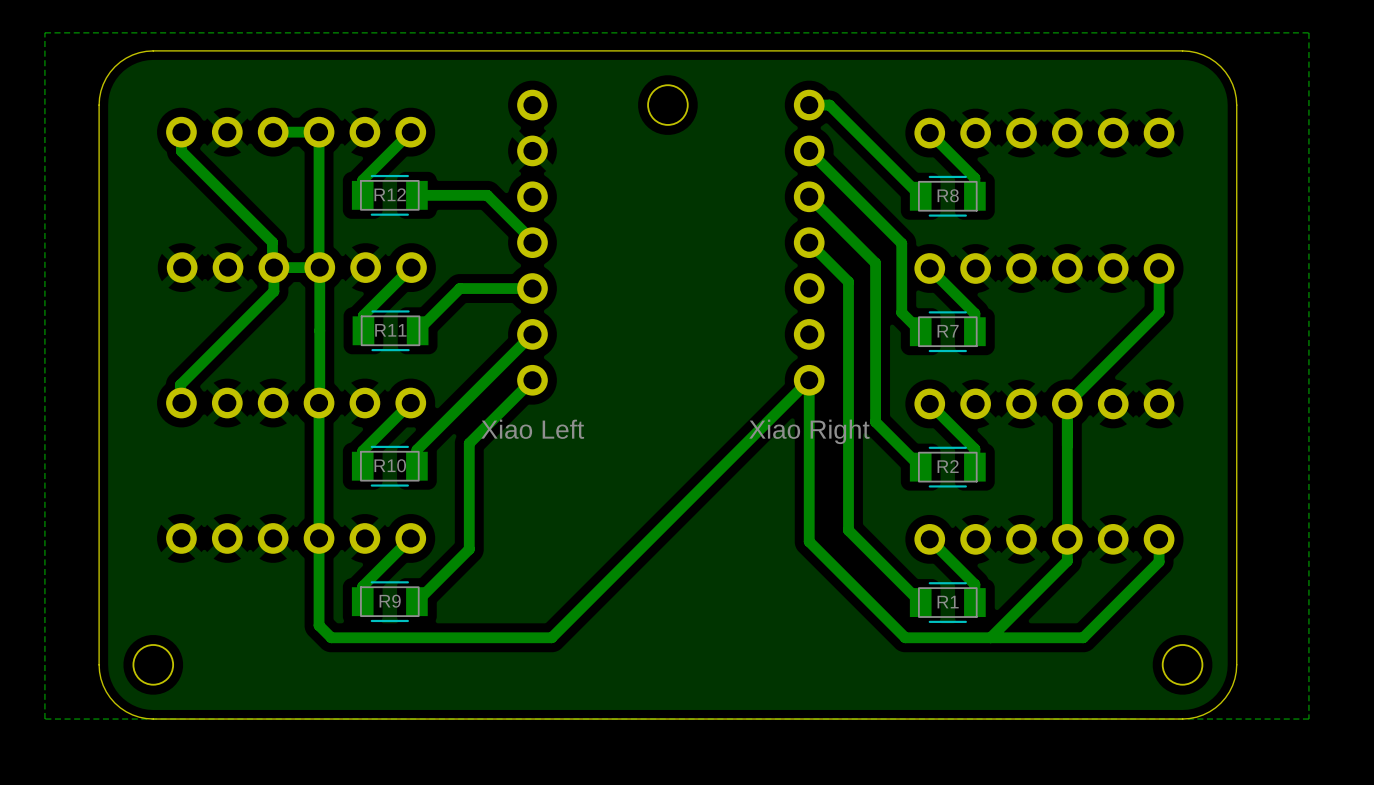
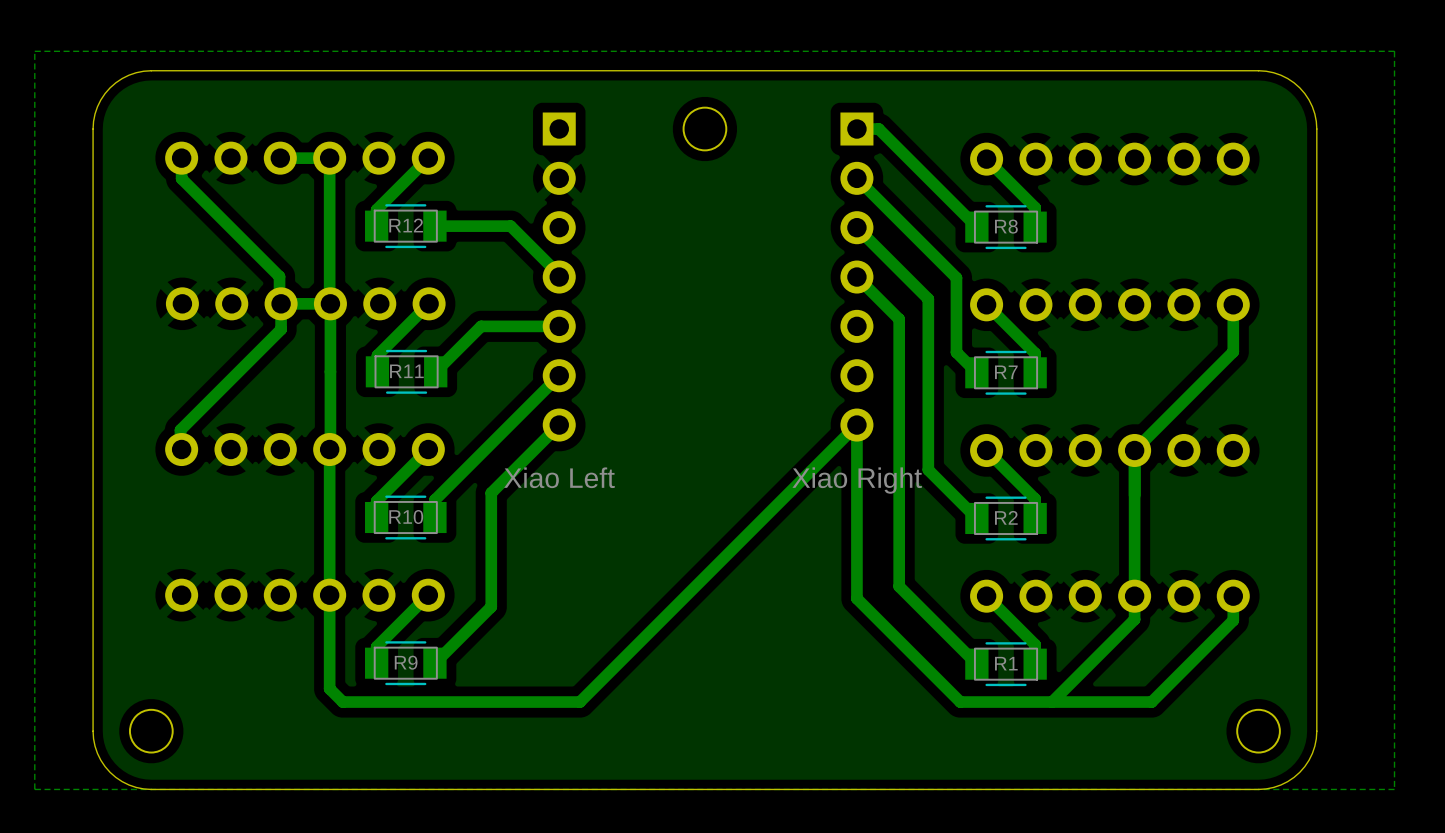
part footprint: [517, 89, 548, 396] -> [542, 112, 576, 442]
part footprint: [793, 89, 825, 396] -> [840, 112, 874, 442]

